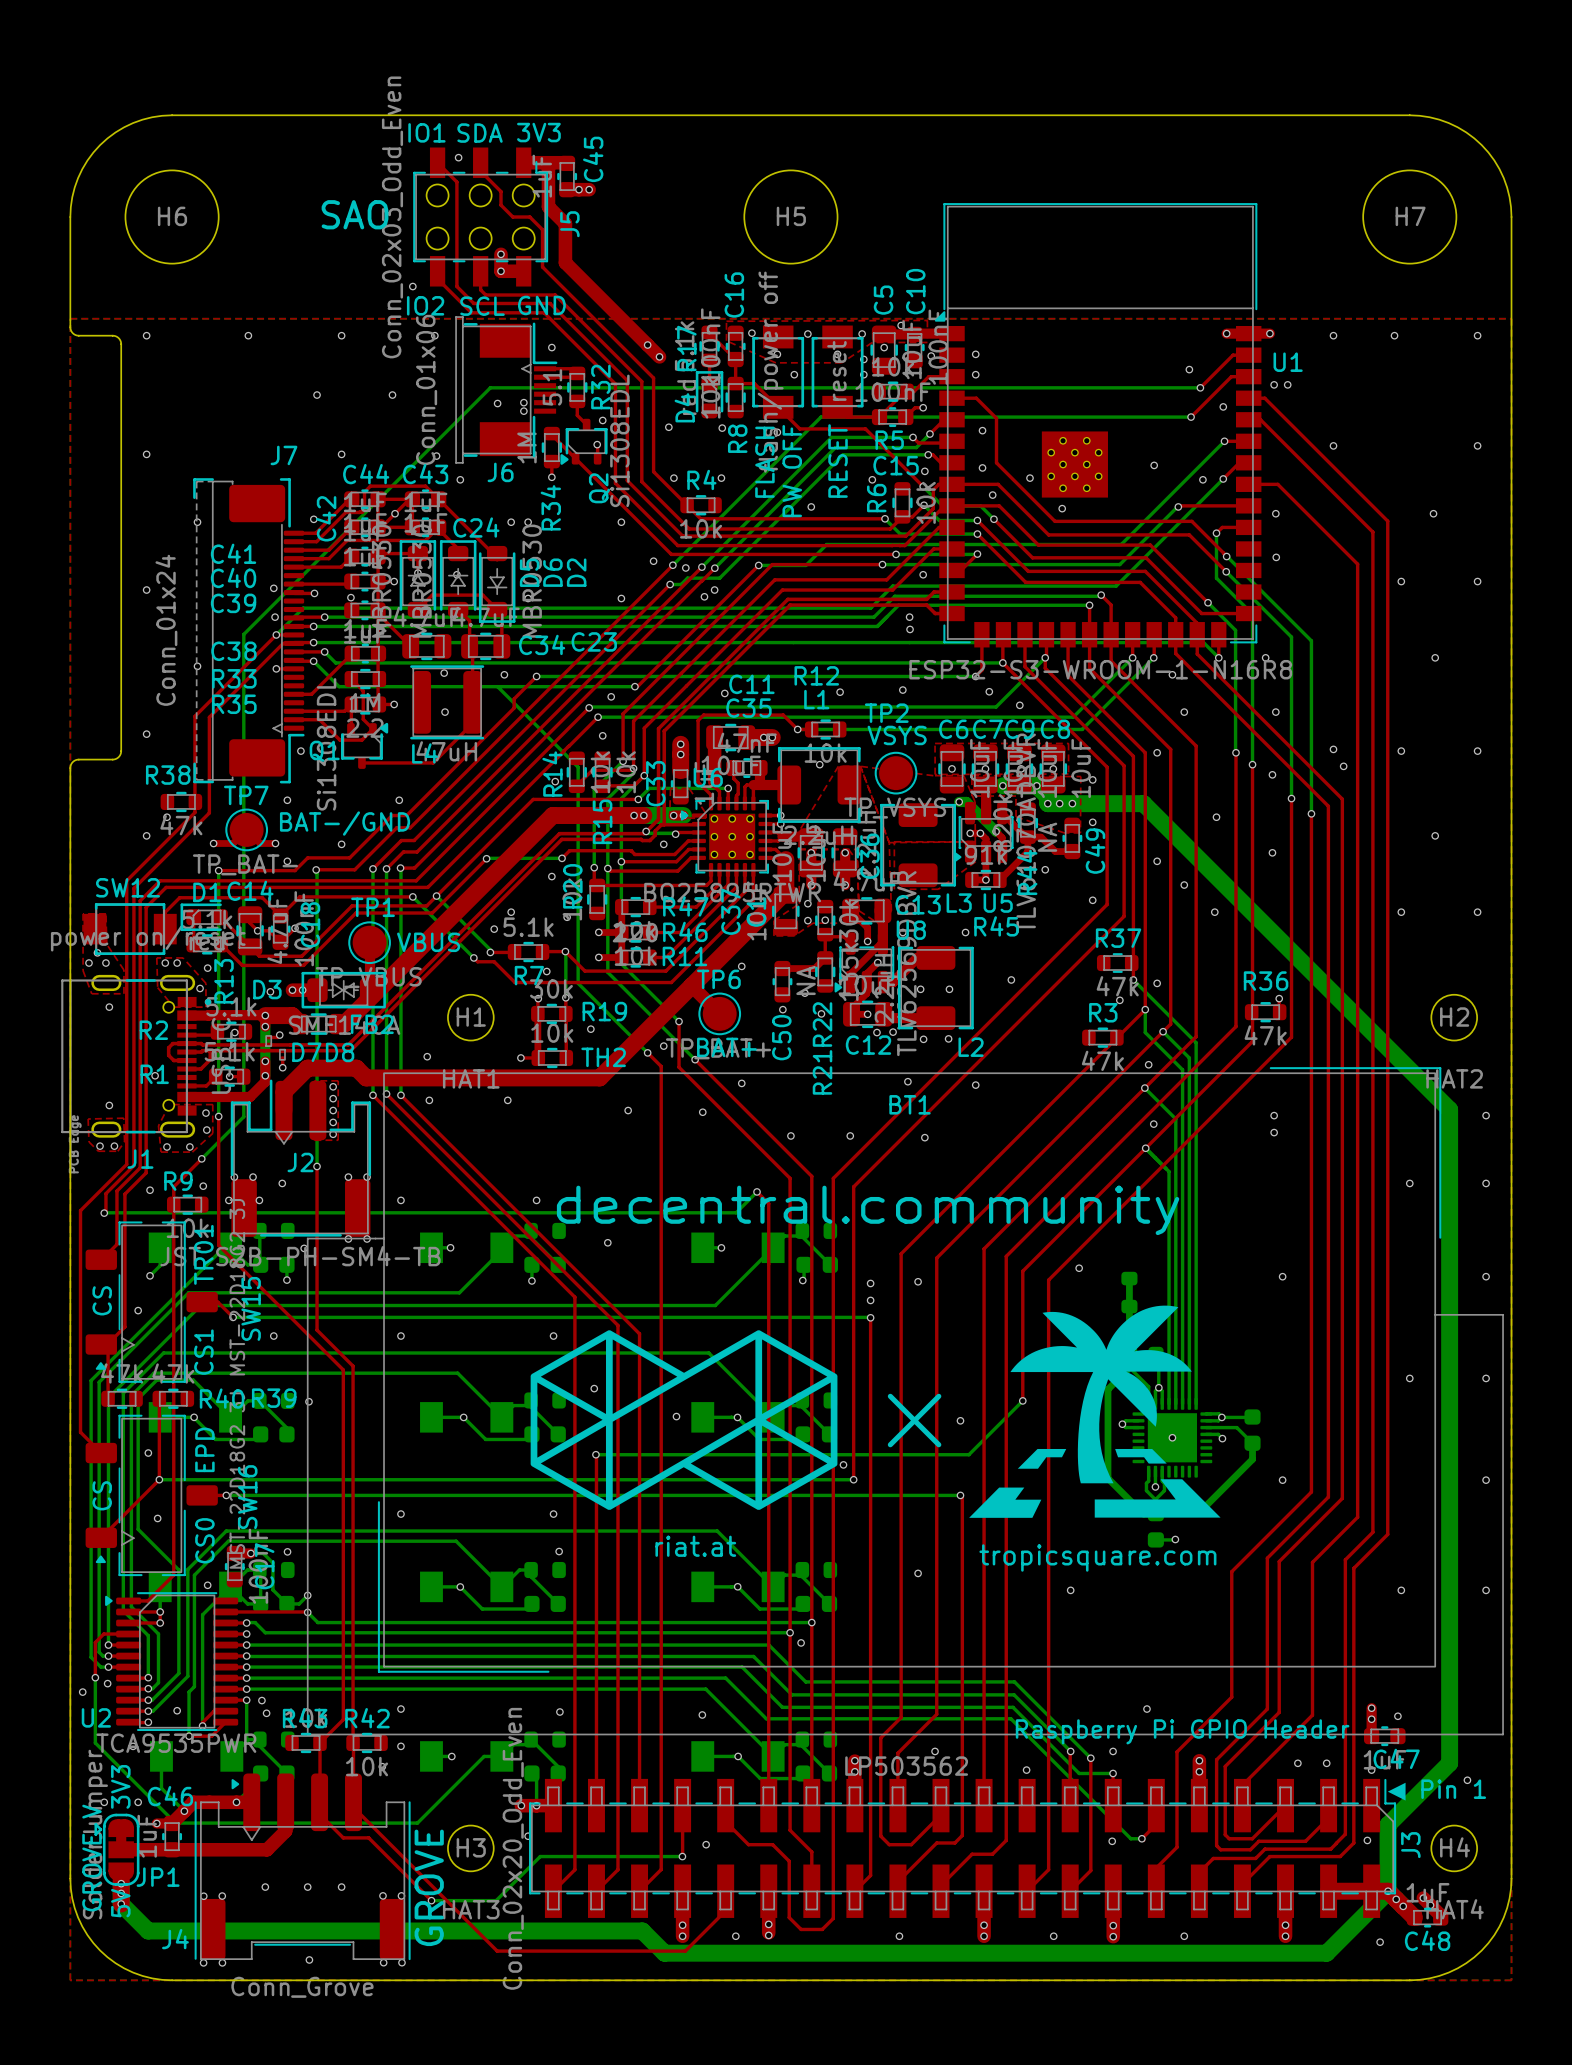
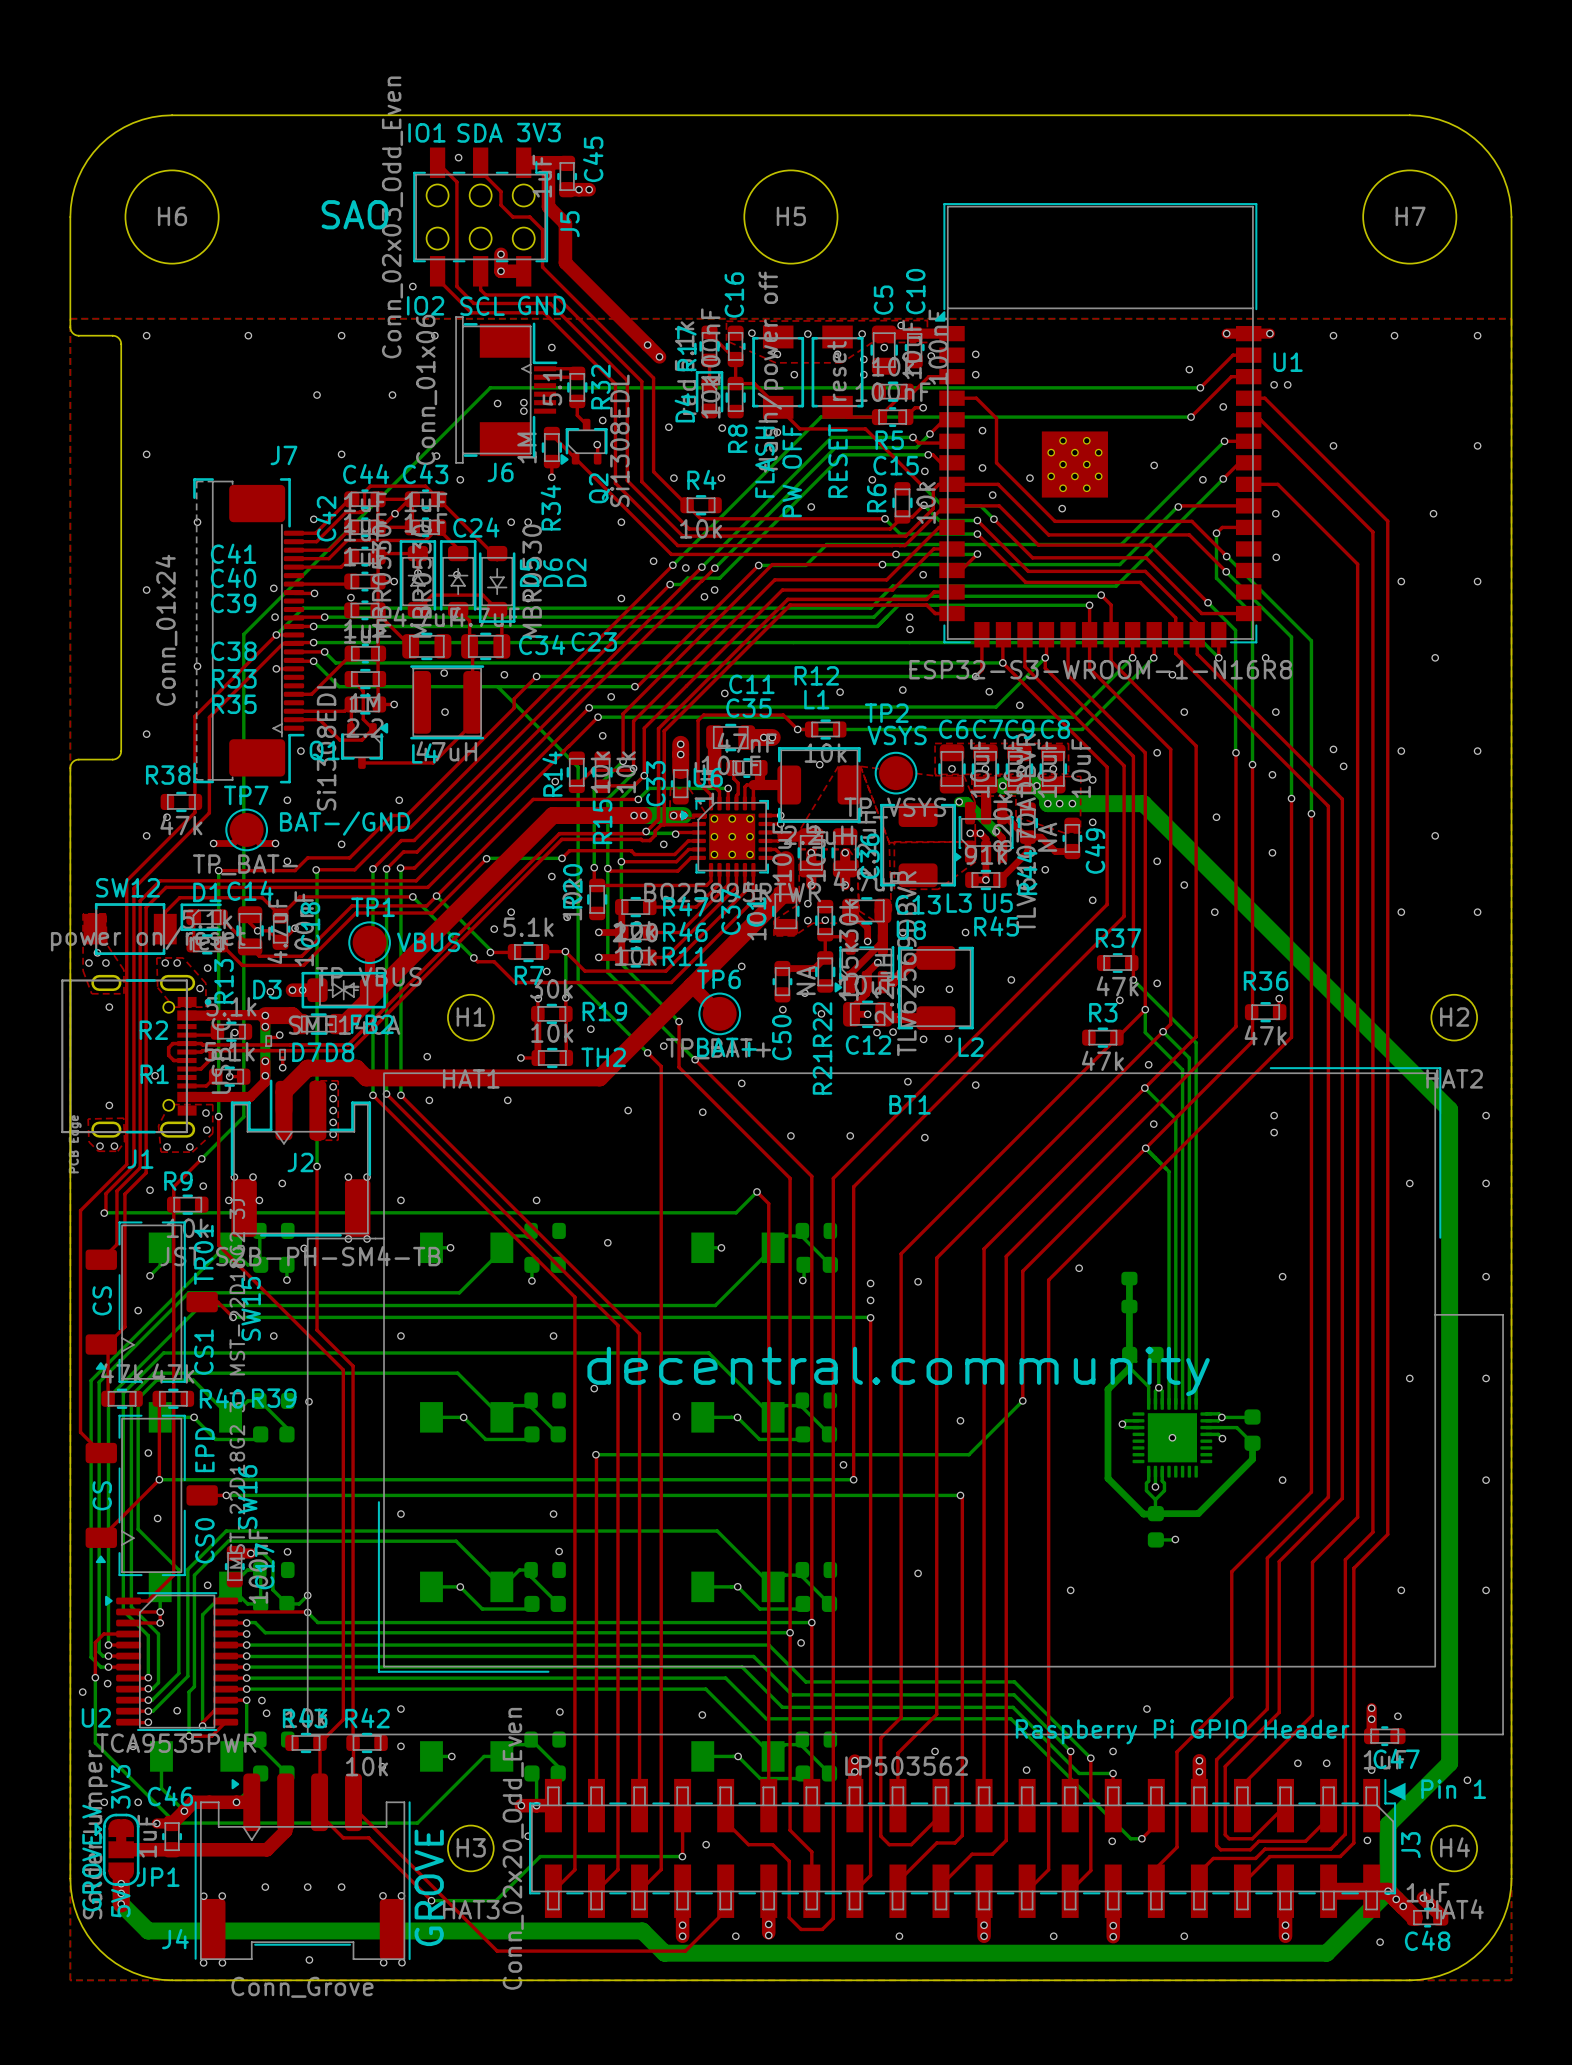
text position: decentral.community (868, 1210) -> decentral.community (898, 1371)
drawing: [969, 1305, 1221, 1518] -> none
drawing: [530, 1330, 838, 1510] -> none
text: × (914, 1420) -> none
text: riat.at (695, 1546) -> none
text: tropicsquare.com (1097, 1557) -> none

